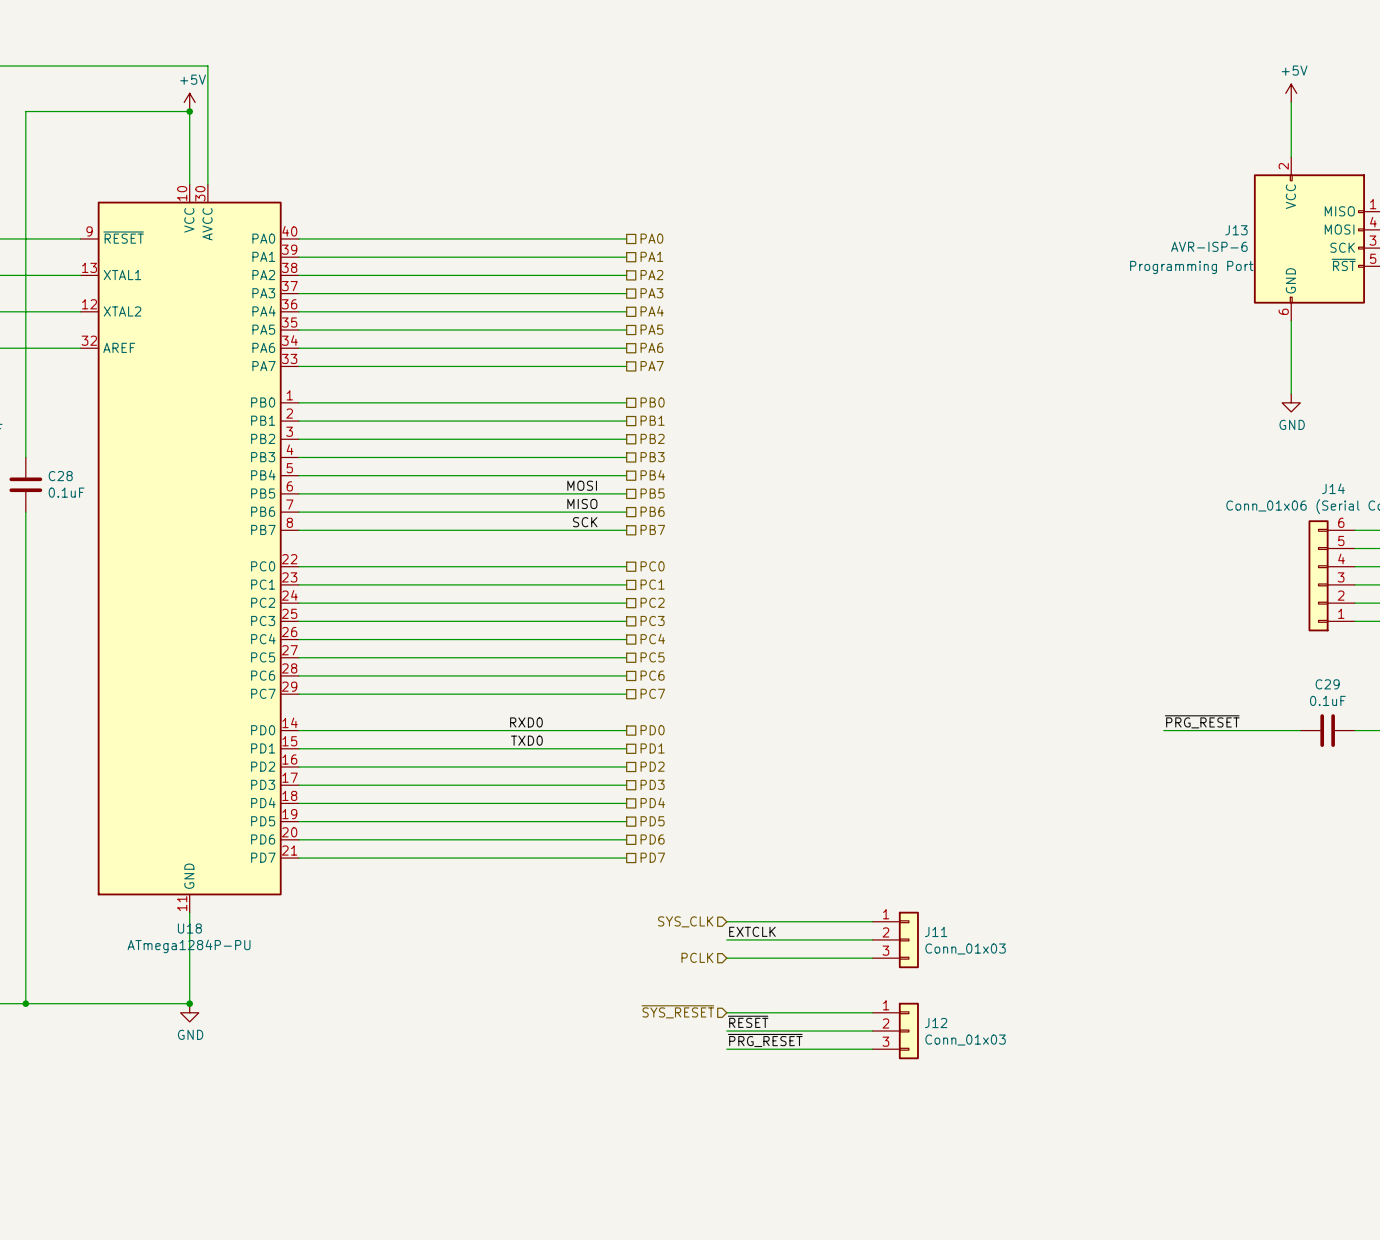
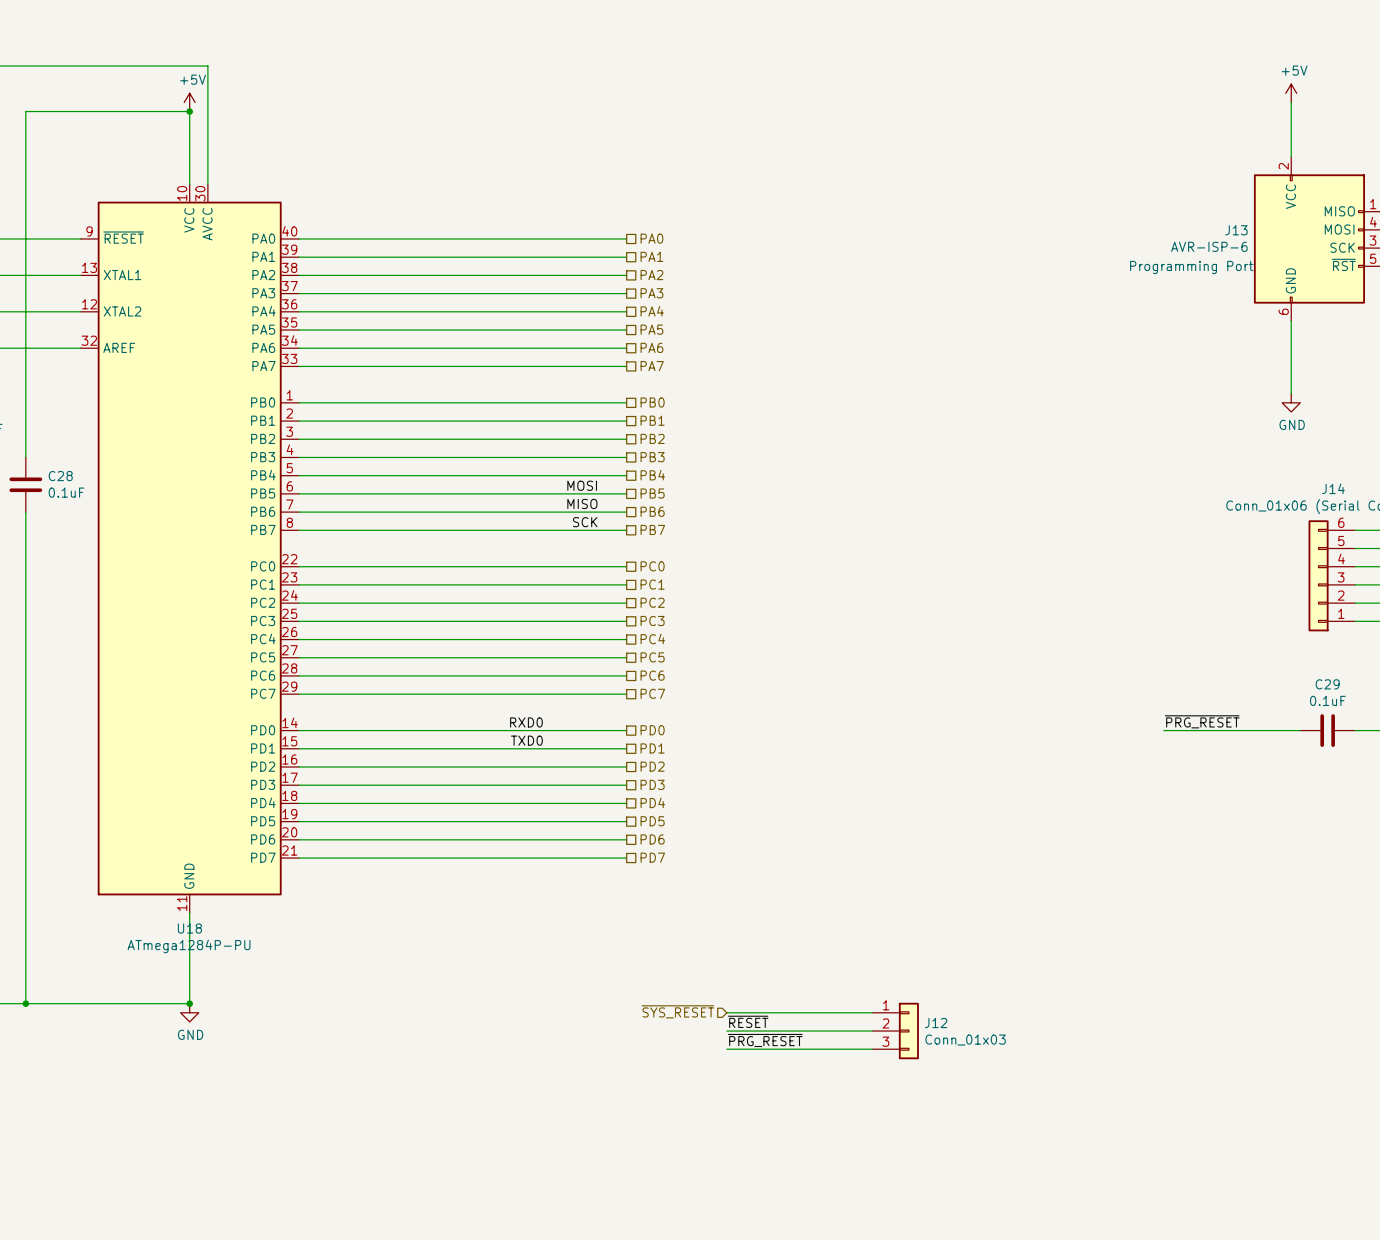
hierarchical label: SYS_CLK (685, 921) -> none
wire: (726, 921) (872, 921) -> none
label: EXTCLK (752, 931) -> none
wire: (726, 939) (872, 939) -> none
J11: Conn_01x03 (895, 939) -> none
hierarchical label: PCLK (697, 957) -> none
wire: (726, 958) (872, 958) -> none

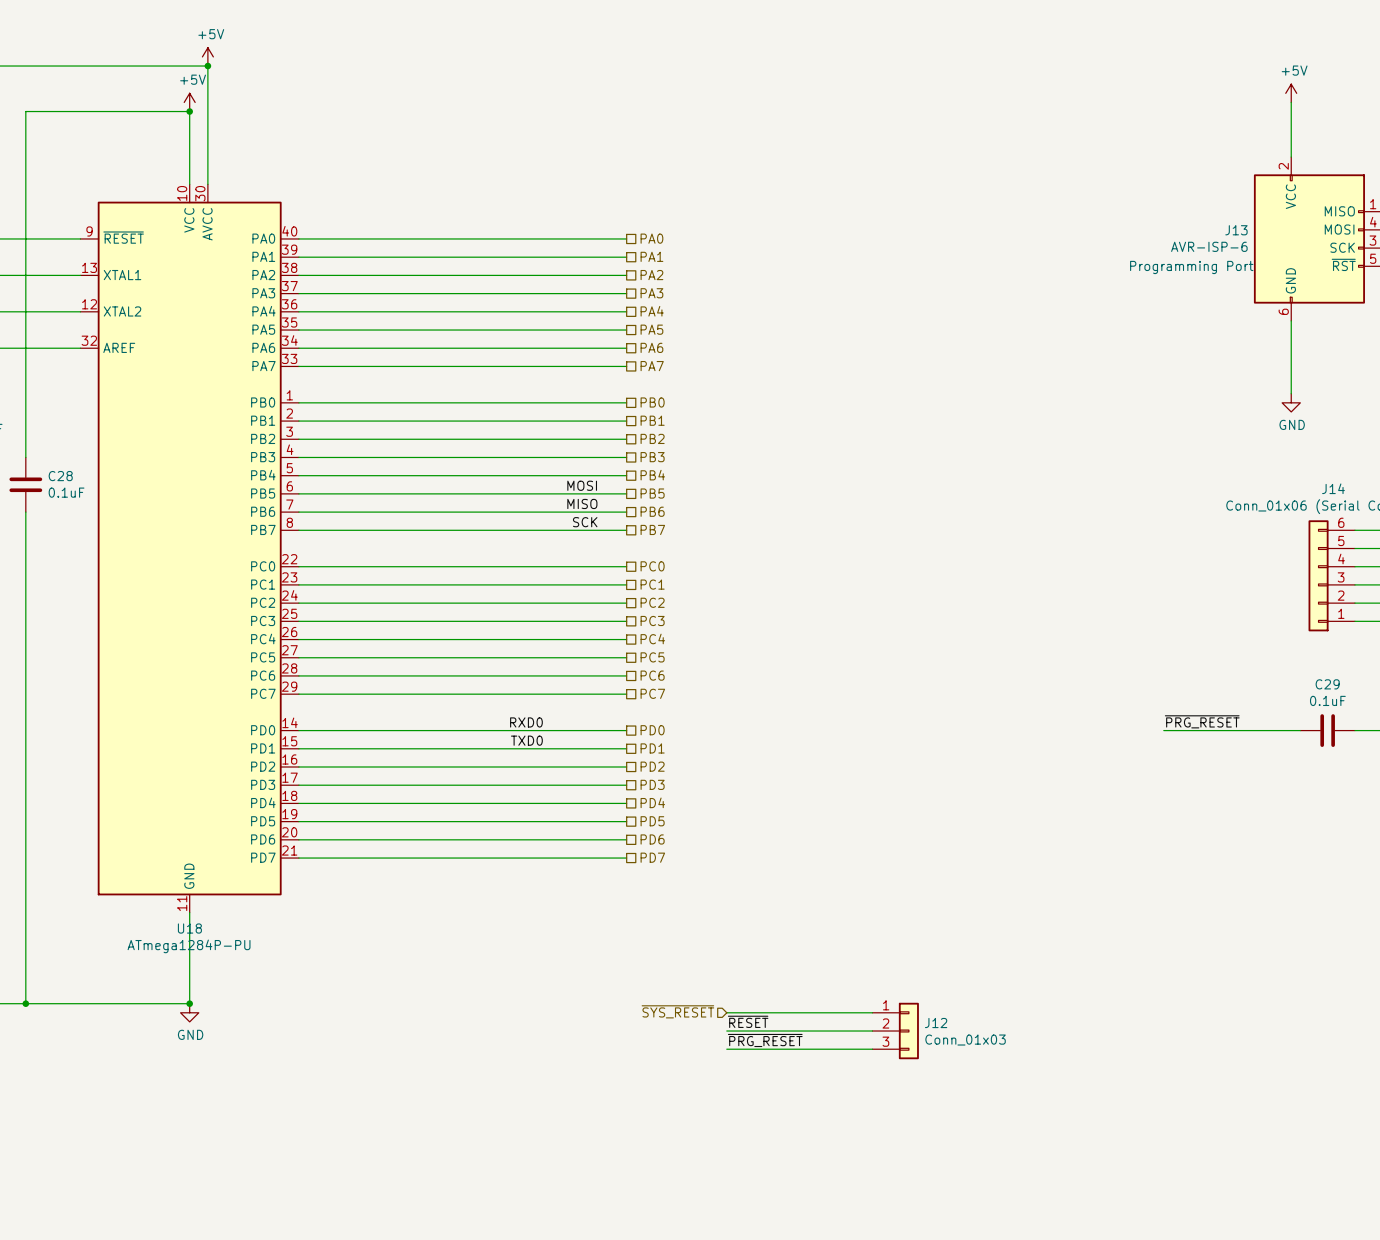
power symbol: none -> +5V (207, 56)
junction: none -> (207, 66)

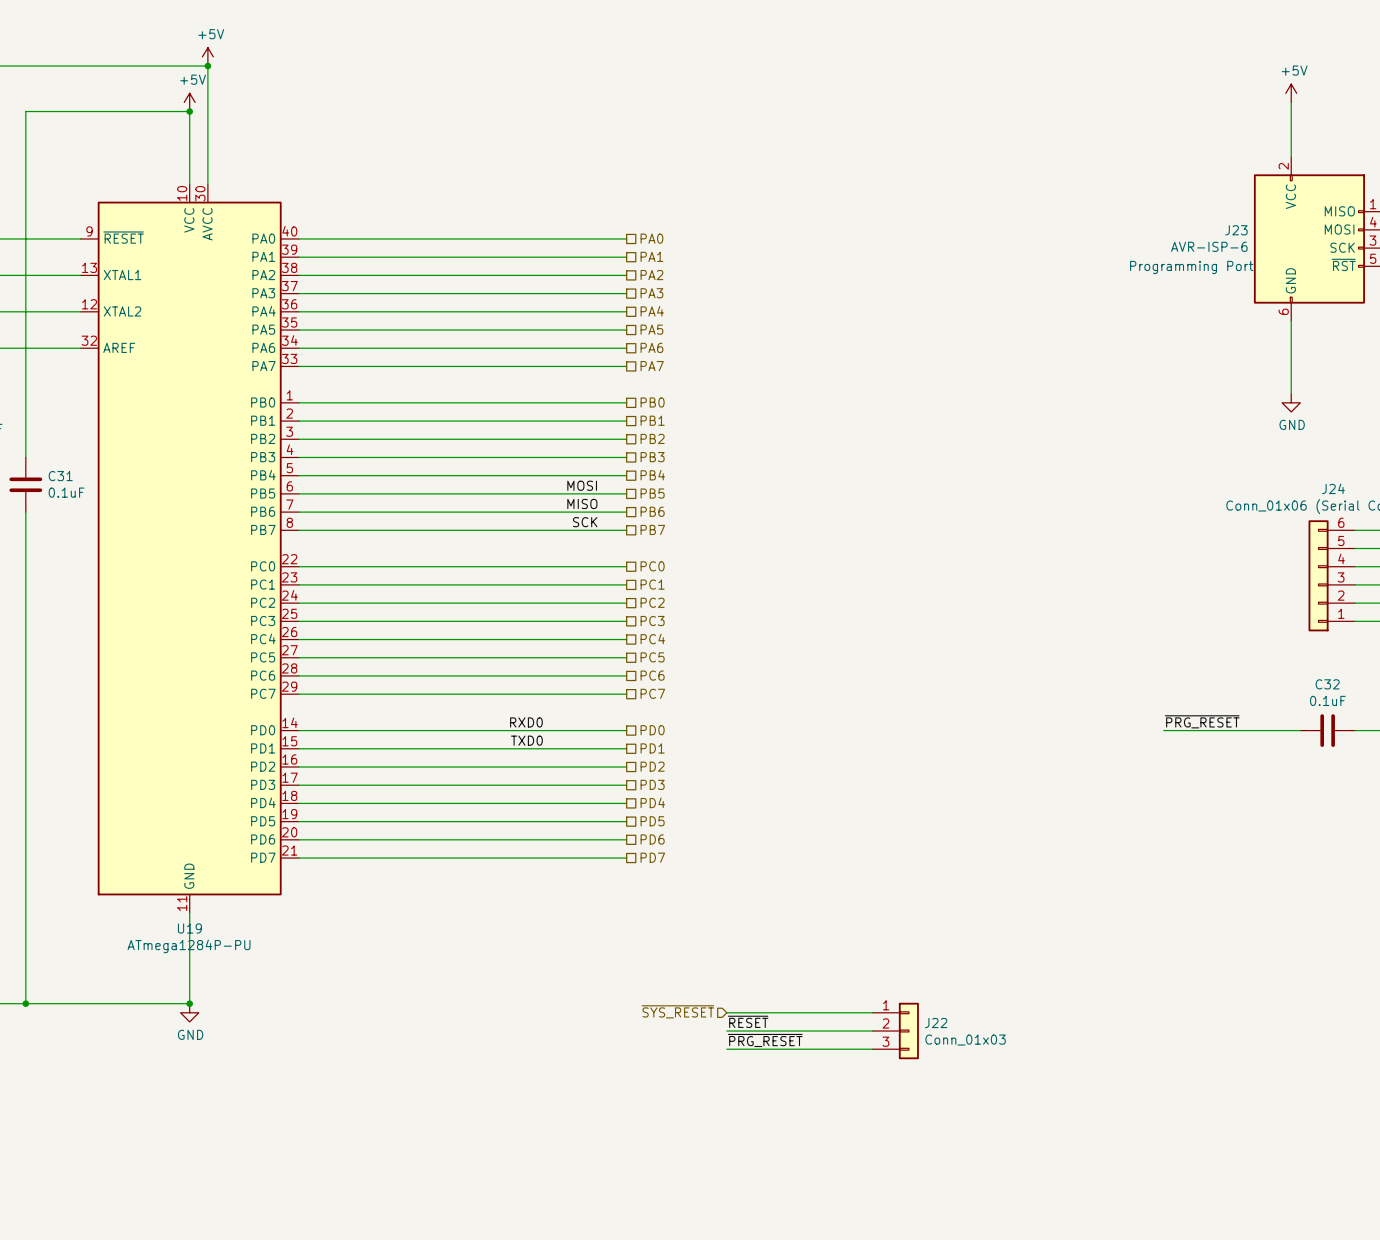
J13 name: J13 (1236, 230) -> J23 (1236, 230)
C28 name: C28 (60, 476) -> C31 (60, 476)
J14 name: J14 (1333, 488) -> J24 (1333, 488)
C29 name: C29 (1327, 684) -> C32 (1327, 684)
U18 name: U18 (189, 928) -> U19 (189, 928)
J12 name: J12 (936, 1023) -> J22 (936, 1023)

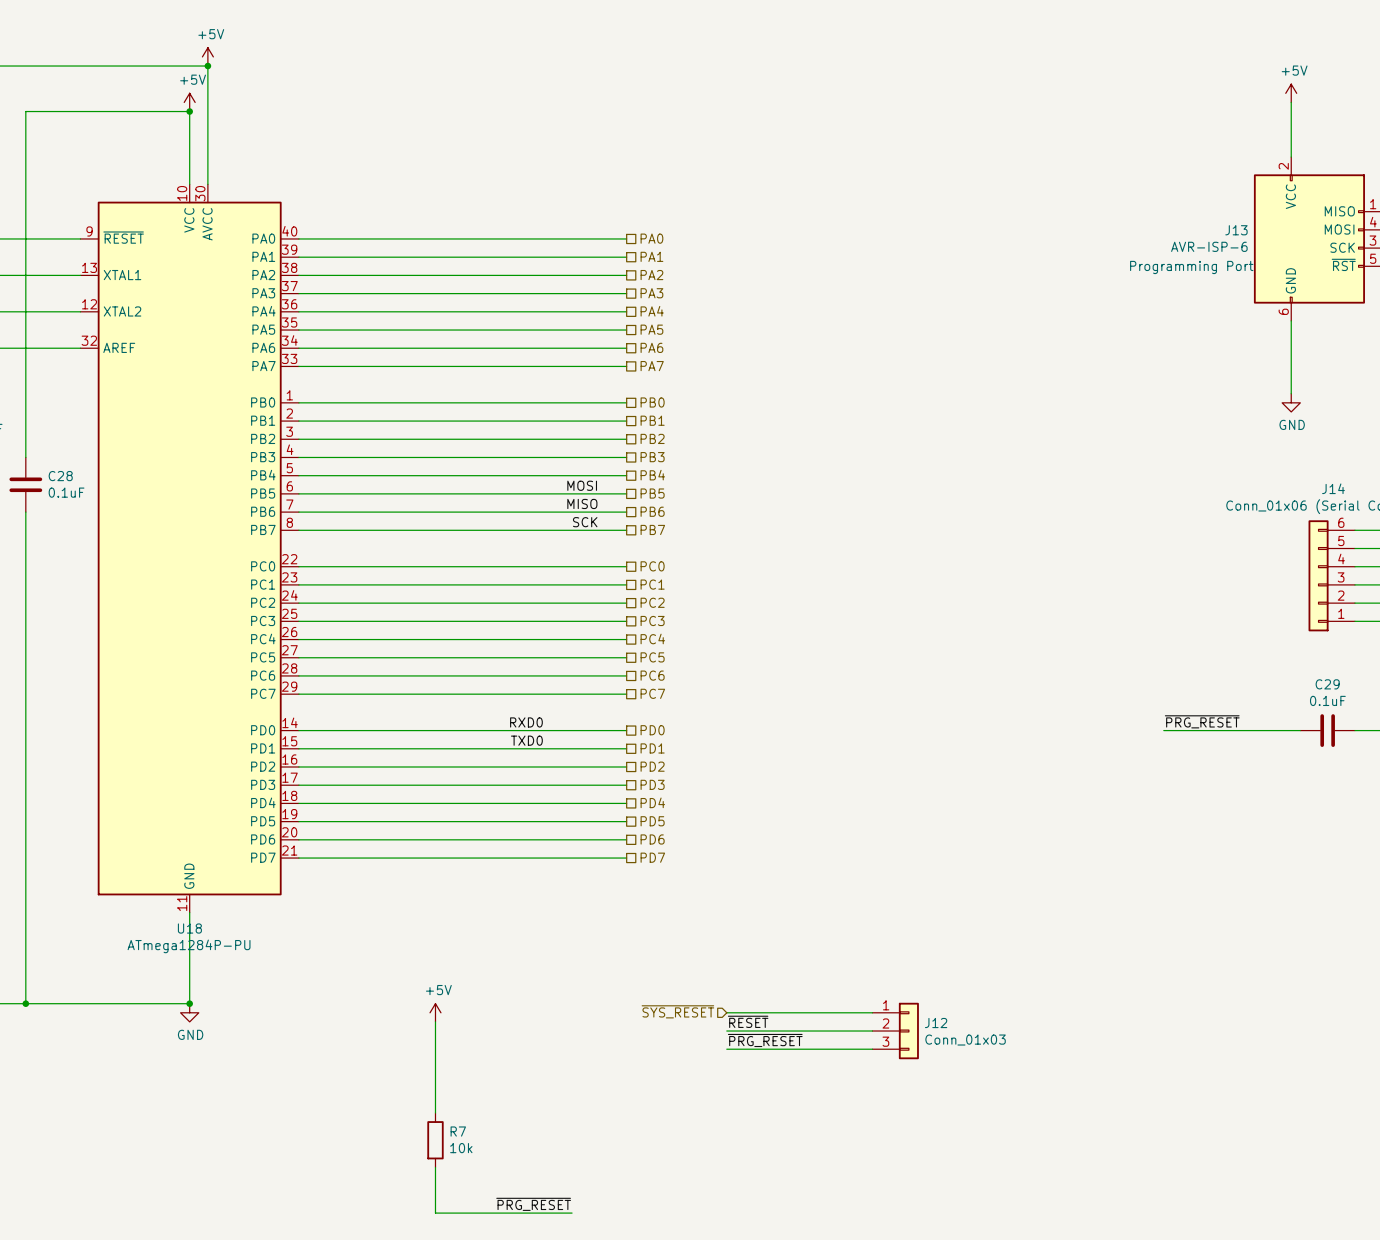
J23 name: J23 (1236, 230) -> J13 (1236, 230)
C31 name: C31 (60, 476) -> C28 (60, 476)
J24 name: J24 (1333, 488) -> J14 (1333, 488)
C32 name: C32 (1327, 684) -> C29 (1327, 684)
U19 name: U19 (189, 928) -> U18 (189, 928)
power symbol: none -> +5V (435, 1012)
wire: none -> (435, 1021) (435, 1112)
J22 name: J22 (936, 1023) -> J12 (936, 1023)
R7: none -> 10k (435, 1140)
wire: none -> (435, 1167) (435, 1213) (572, 1213)
label: none -> ~{PRG_RESET} (533, 1204)

